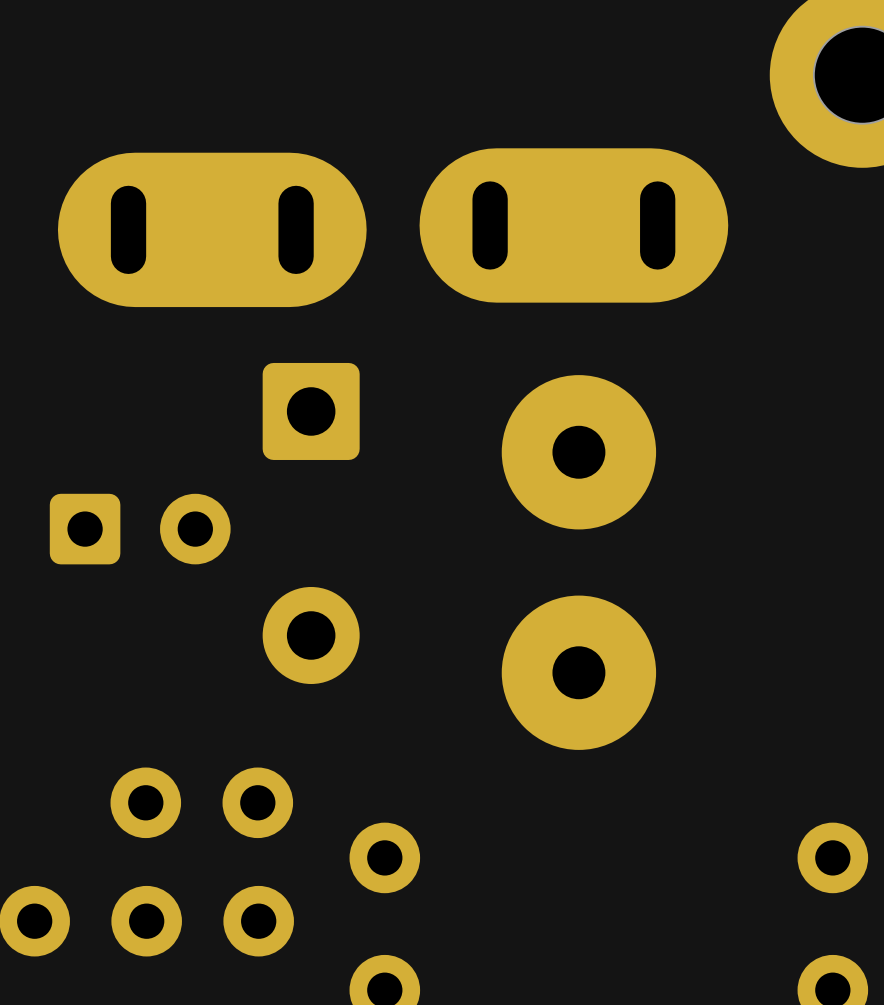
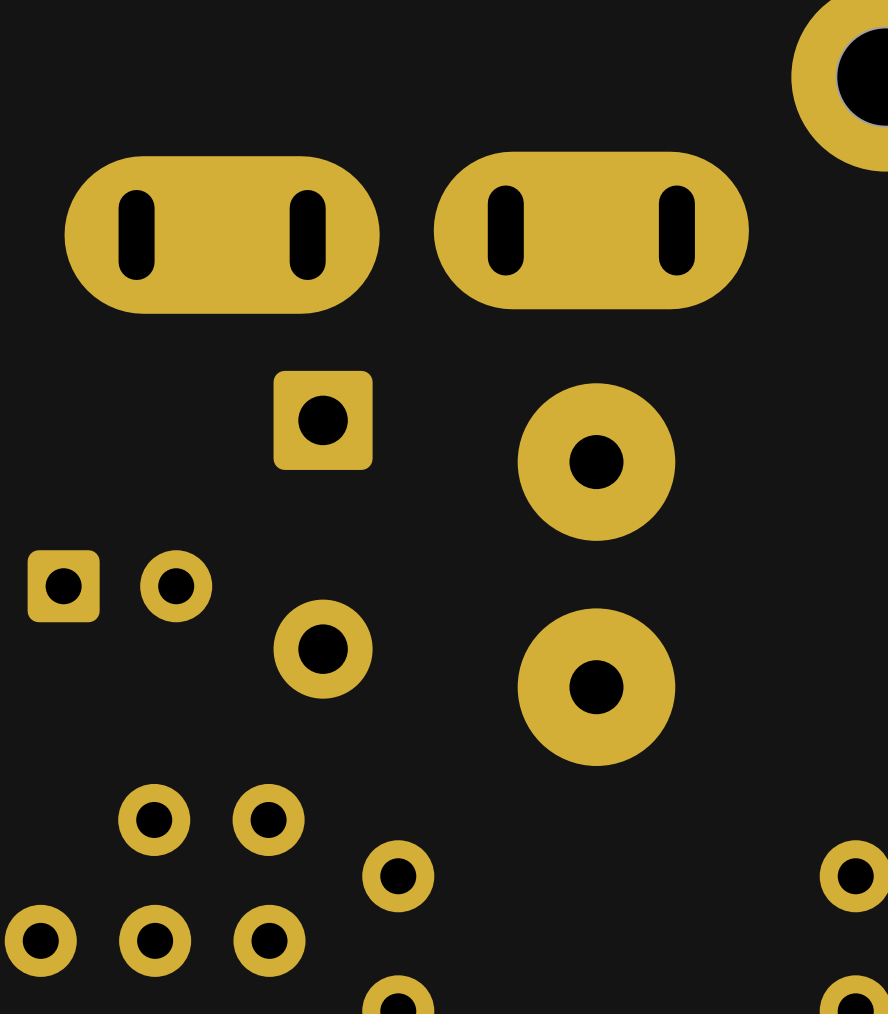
part position: (140, 529) -> (119, 586)

